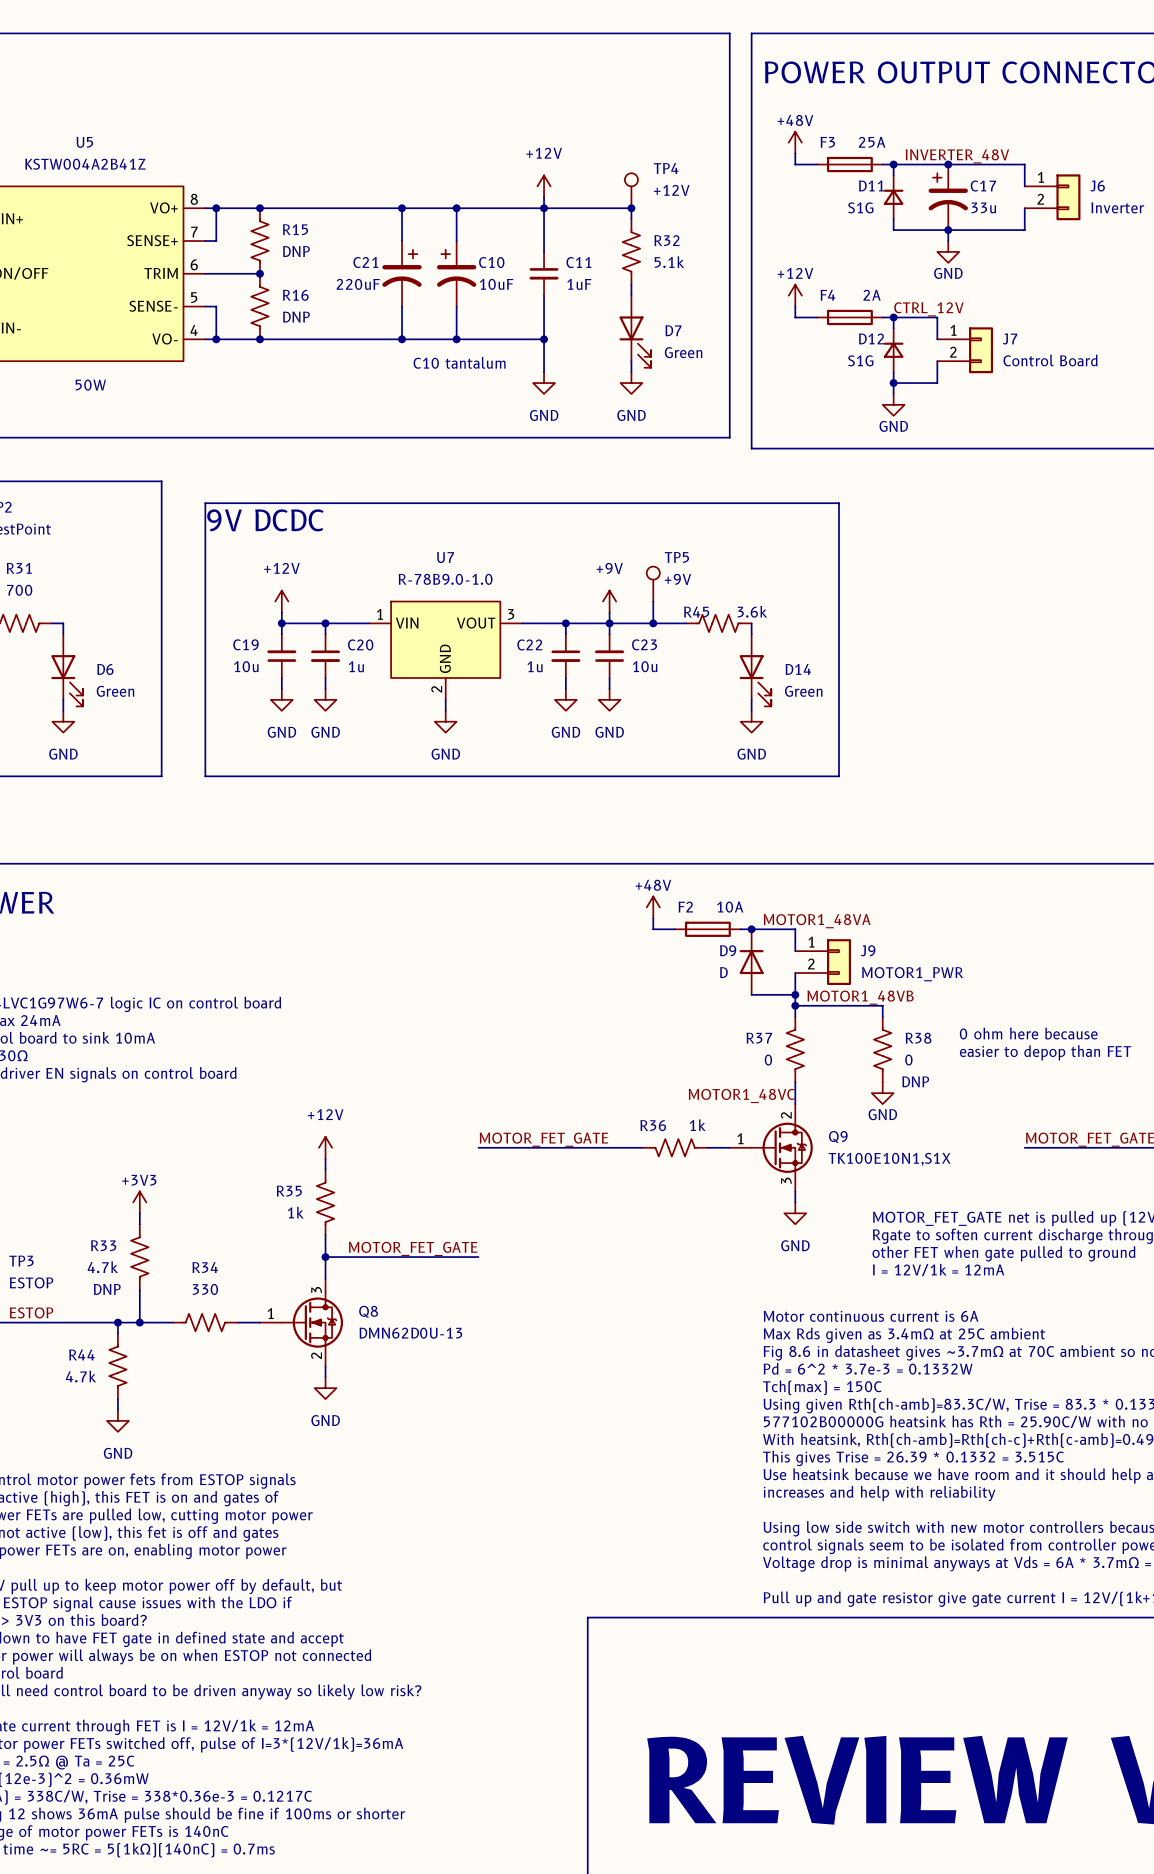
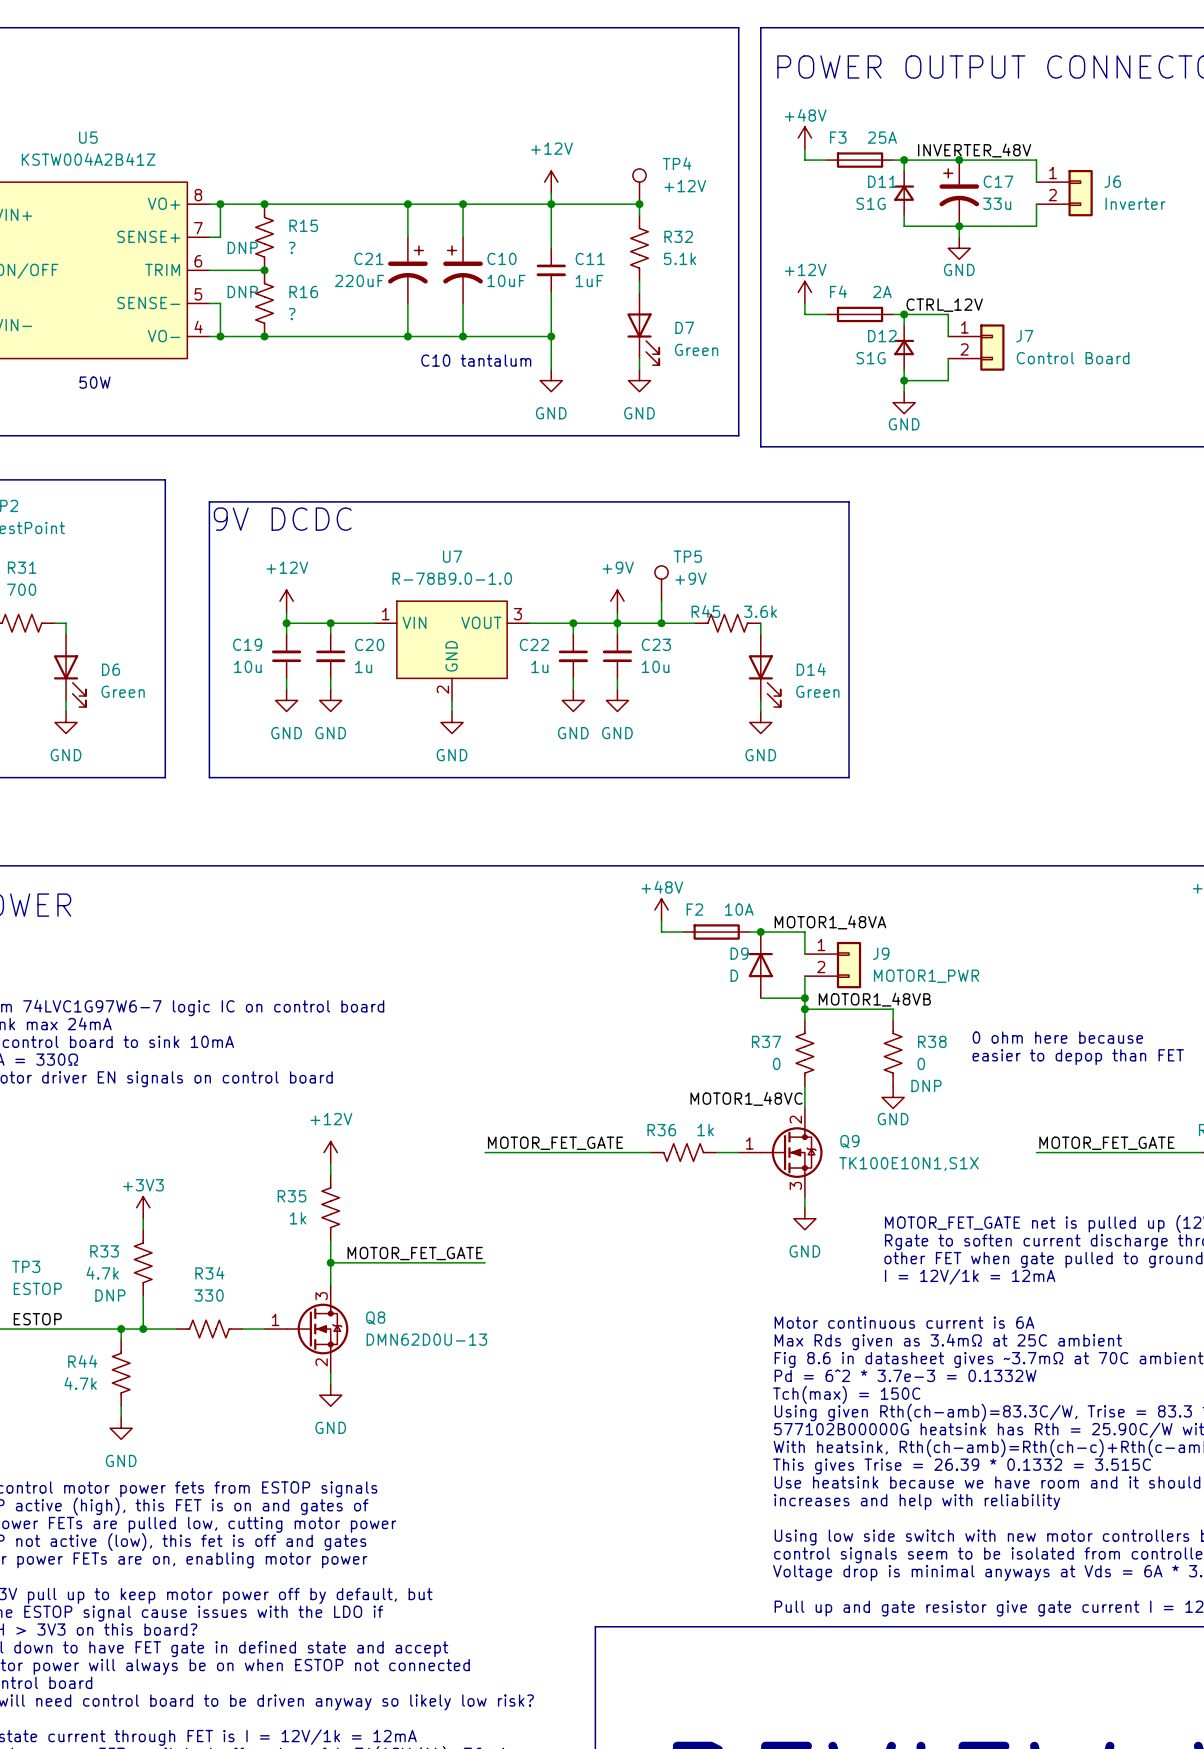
R15 text: none -> DNP (242, 247)
R15 value: DNP (296, 251) -> ? (292, 247)
R16 text: none -> DNP (242, 291)
R16 value: DNP (296, 317) -> ? (292, 314)

